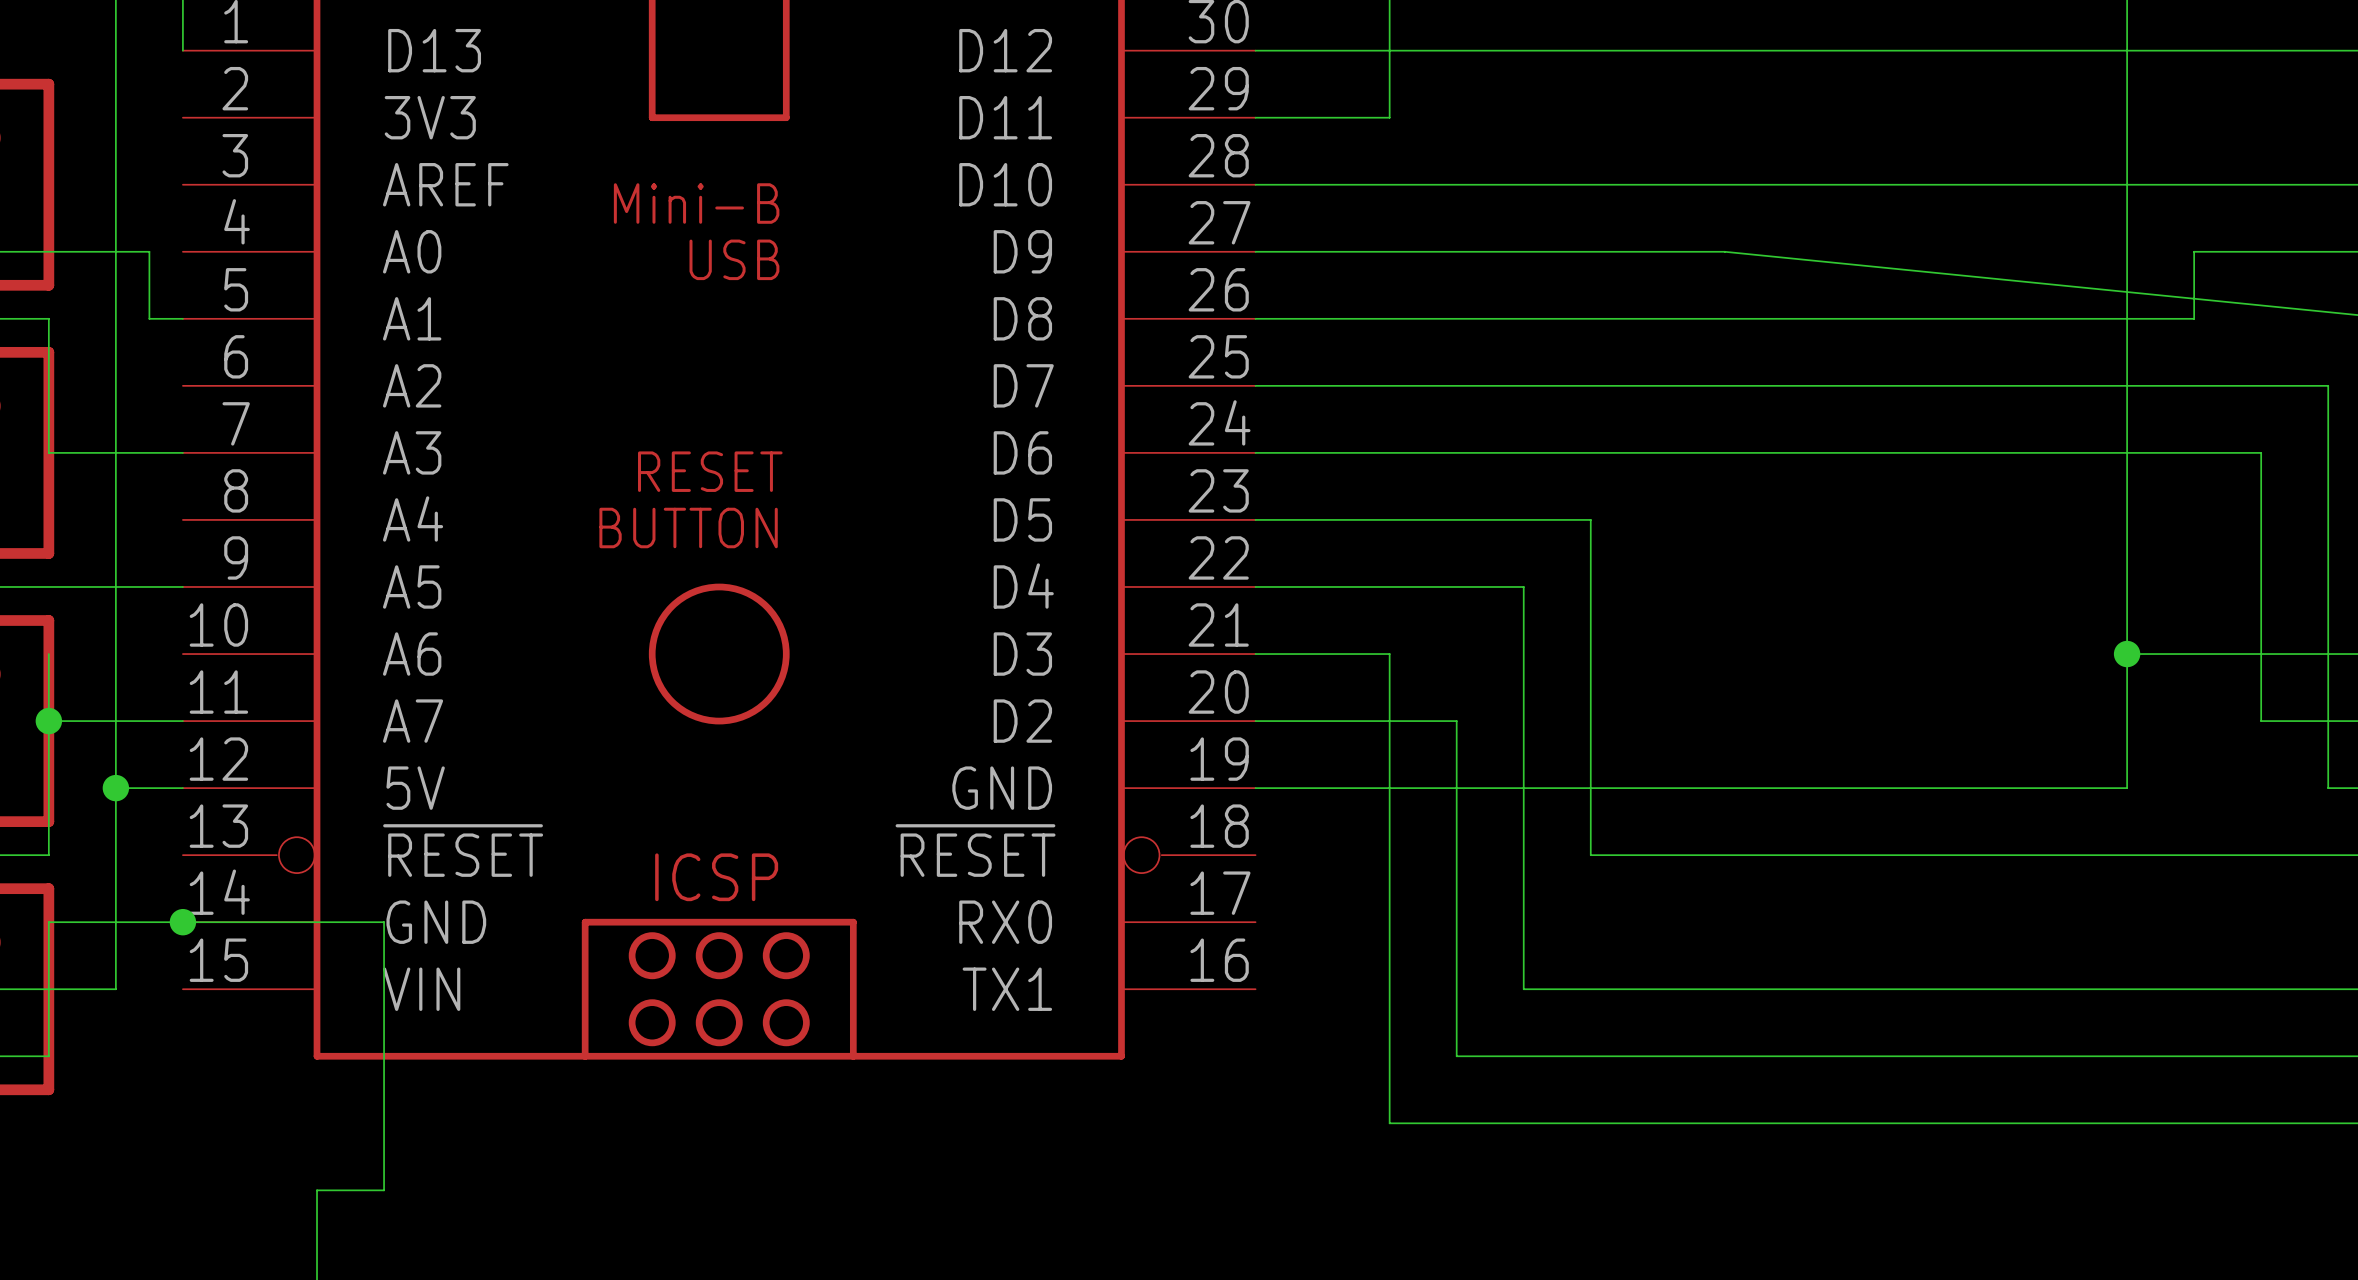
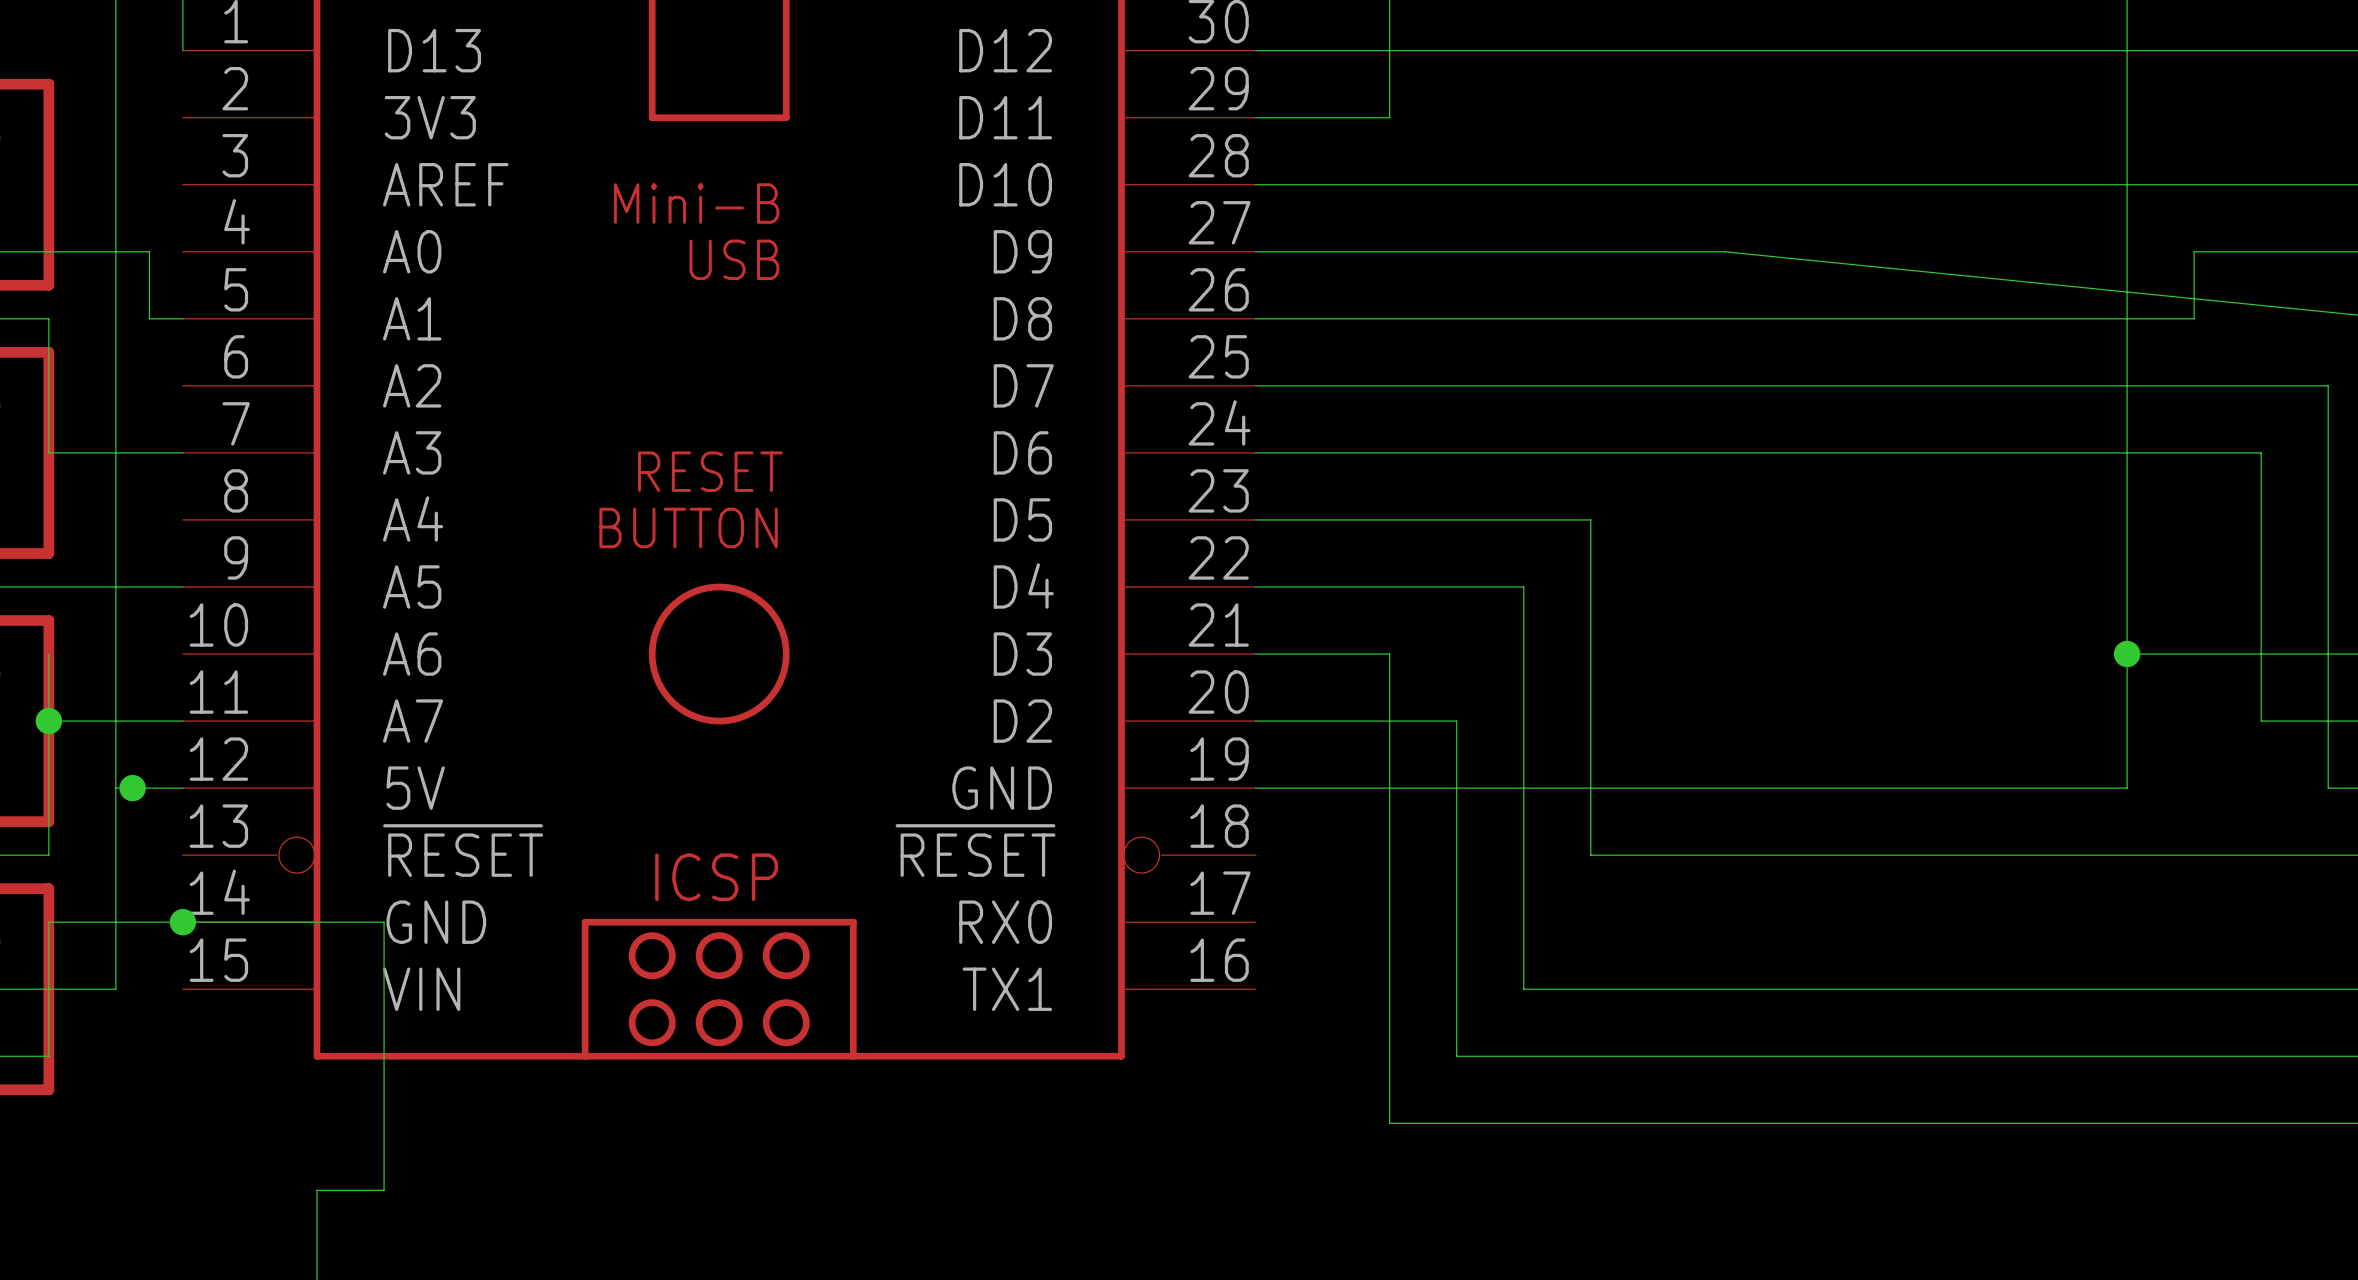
junction position: (115, 788) -> (132, 788)

